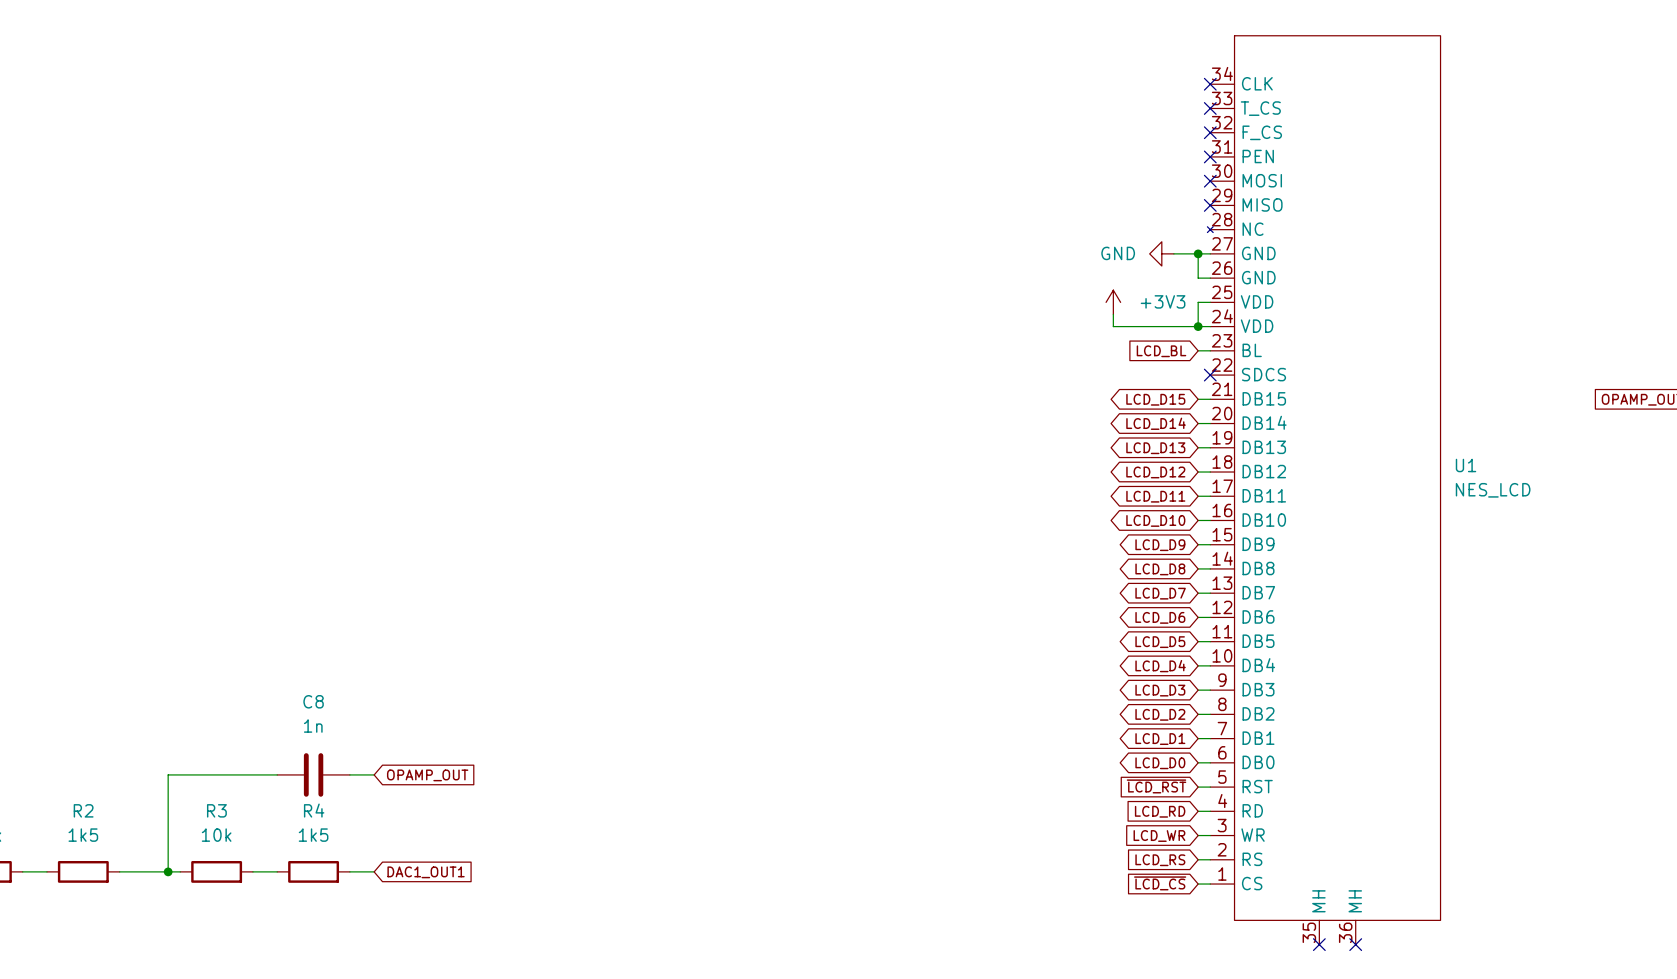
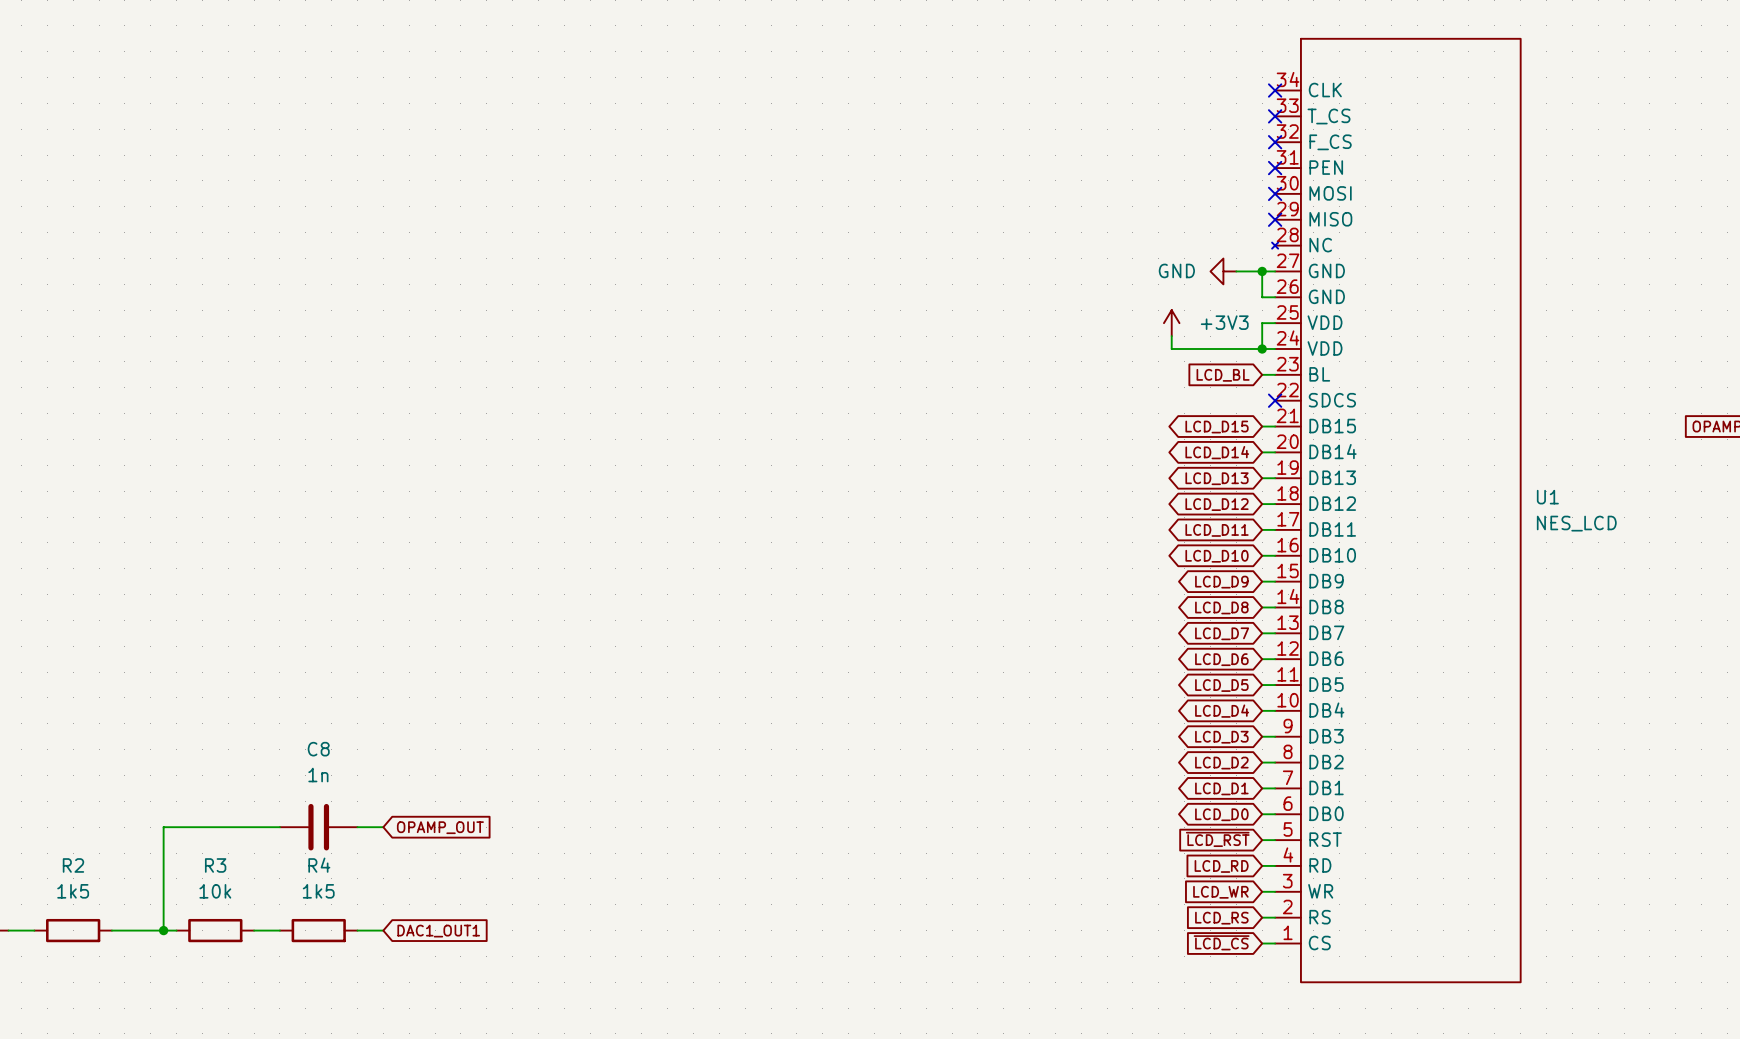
U1 symbol: [1207, 35, 1441, 945] -> [1272, 38, 1521, 983]
no-connect mark: (1319, 944) -> none
no-connect mark: (1355, 944) -> none

